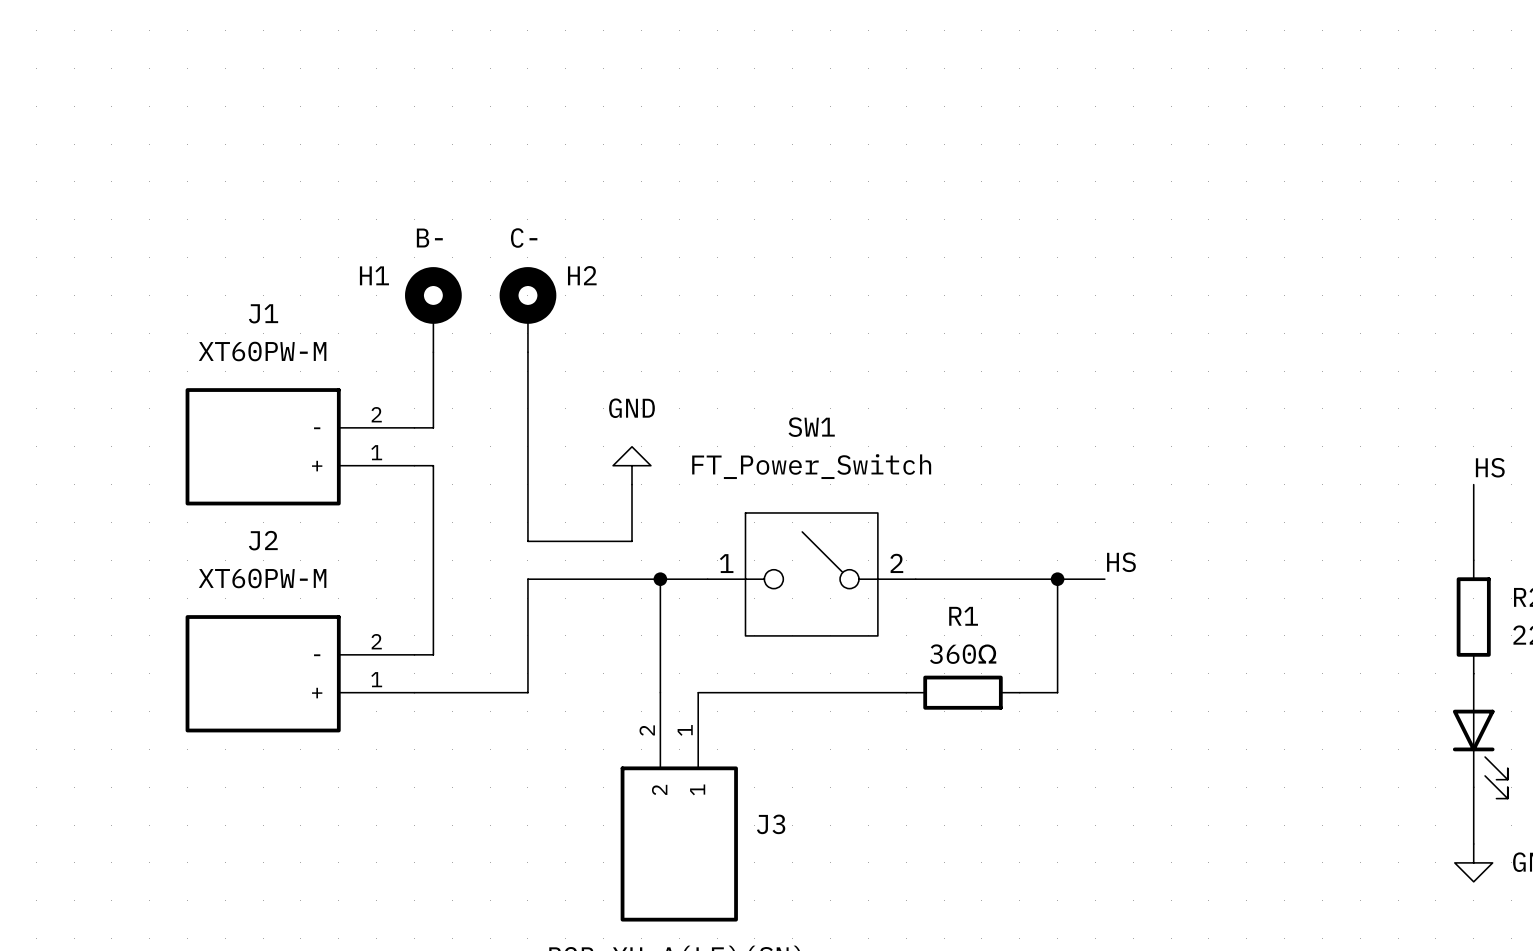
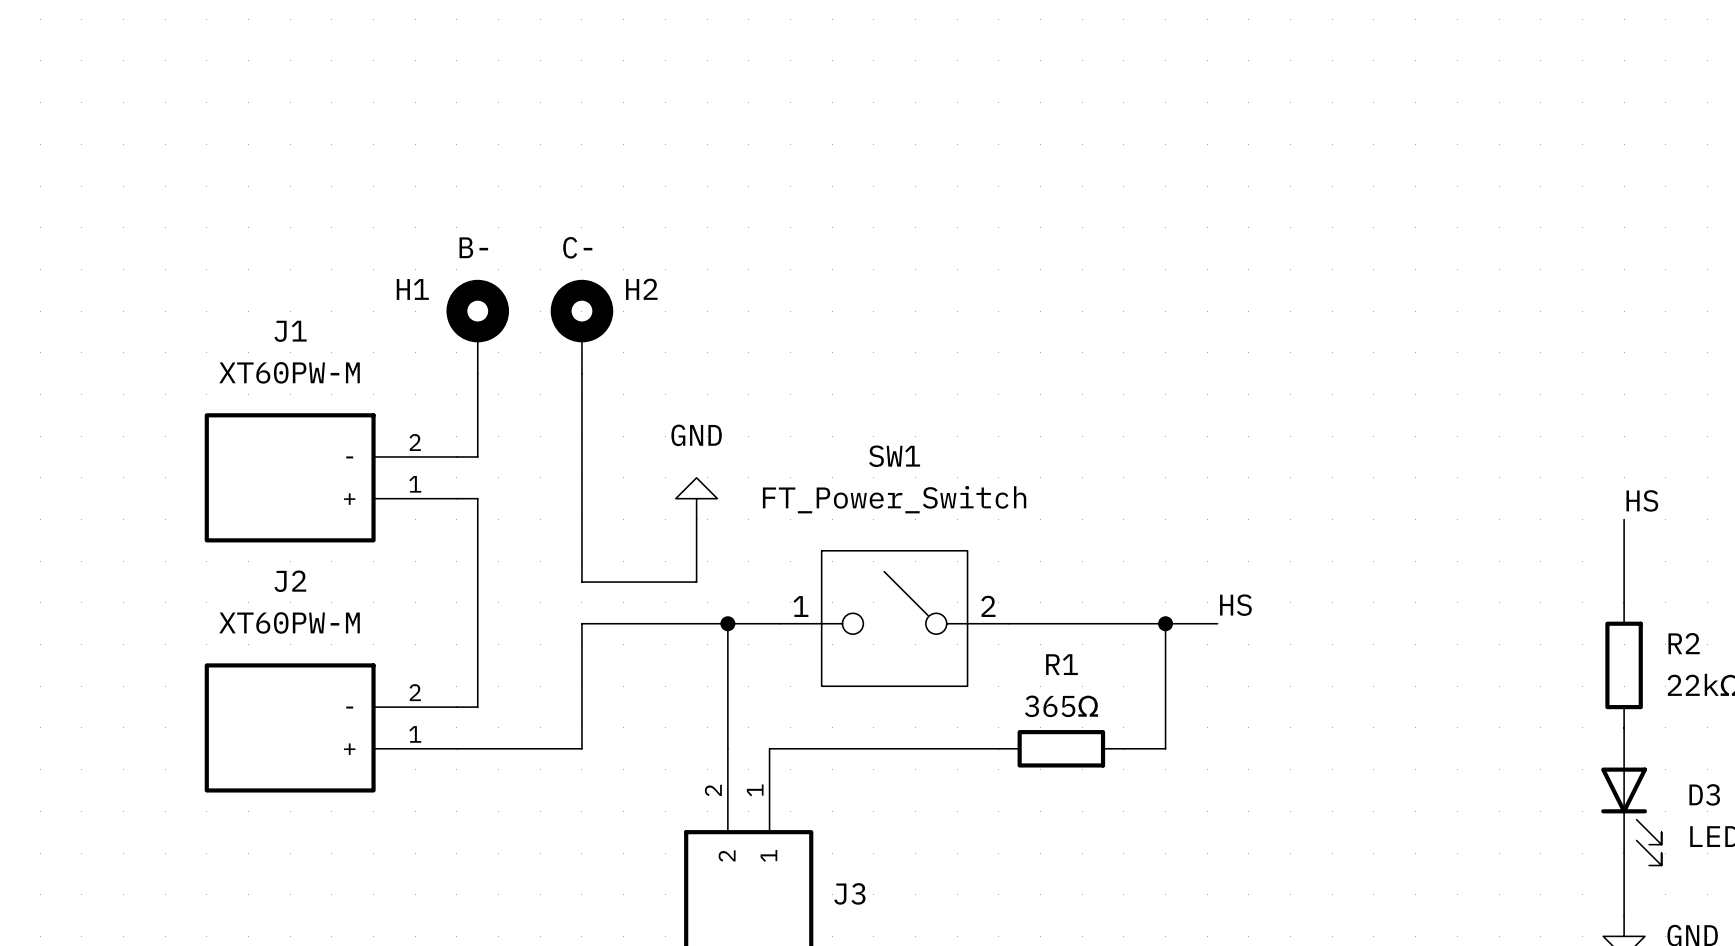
R1 value: 360Ω (963, 654) -> 365Ω (1061, 706)

